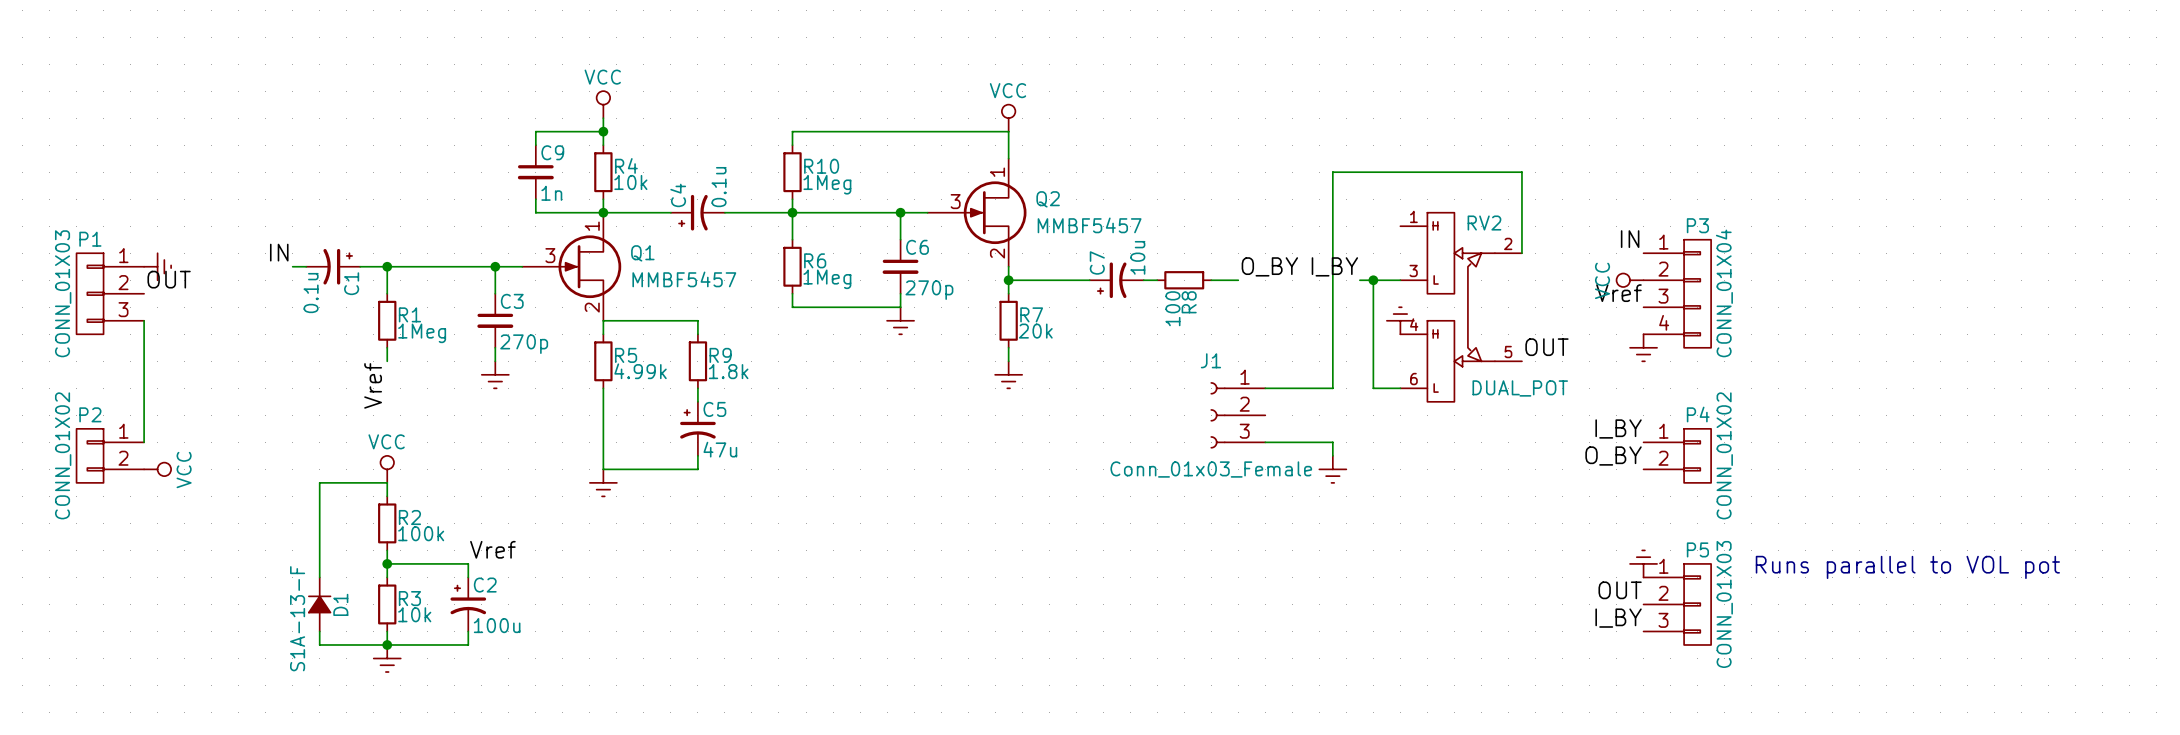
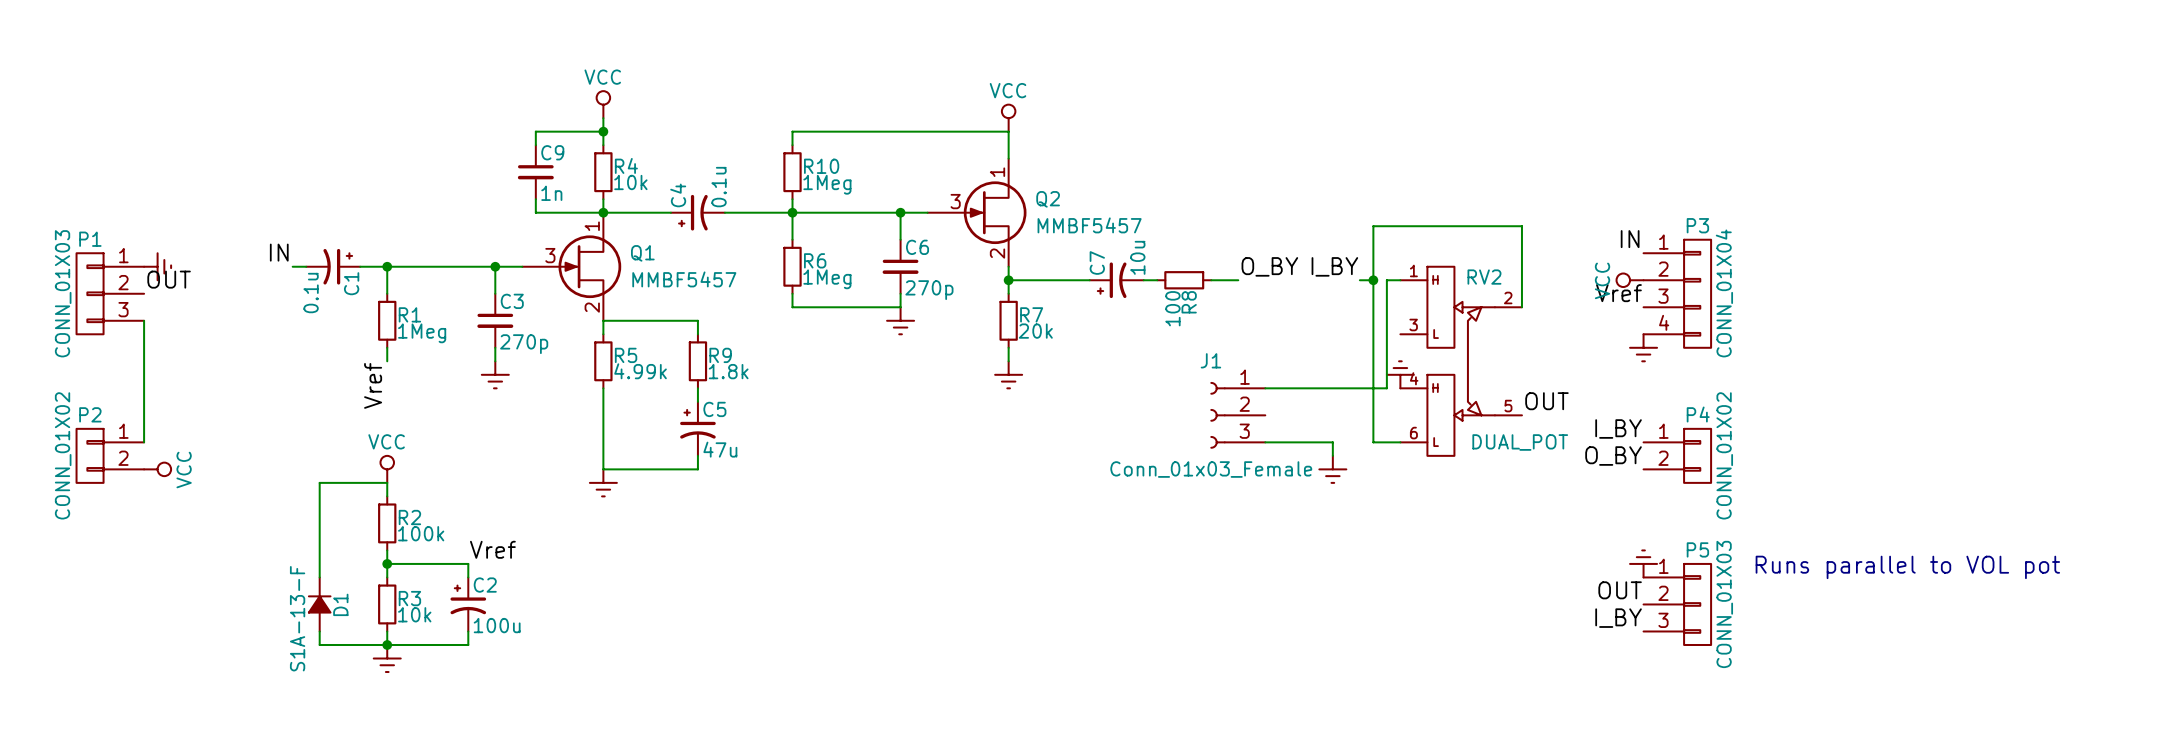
wire: (1521, 226) (1521, 172) (1332, 172) (1332, 388) -> (1521, 226) (1373, 226) (1373, 280)
wire: none -> (1521, 253) (1521, 307)
wire: (1373, 280) (1386, 280) -> none
RV2 position: (1461, 307) -> (1461, 361)
power symbol position: (1400, 320) -> (1400, 374)
label position: OUT (1546, 347) -> OUT (1546, 401)
wire: none -> (1332, 388) (1373, 388) (1373, 442) (1400, 442)
wire: (1386, 388) (1400, 388) -> (1386, 388) (1386, 280)

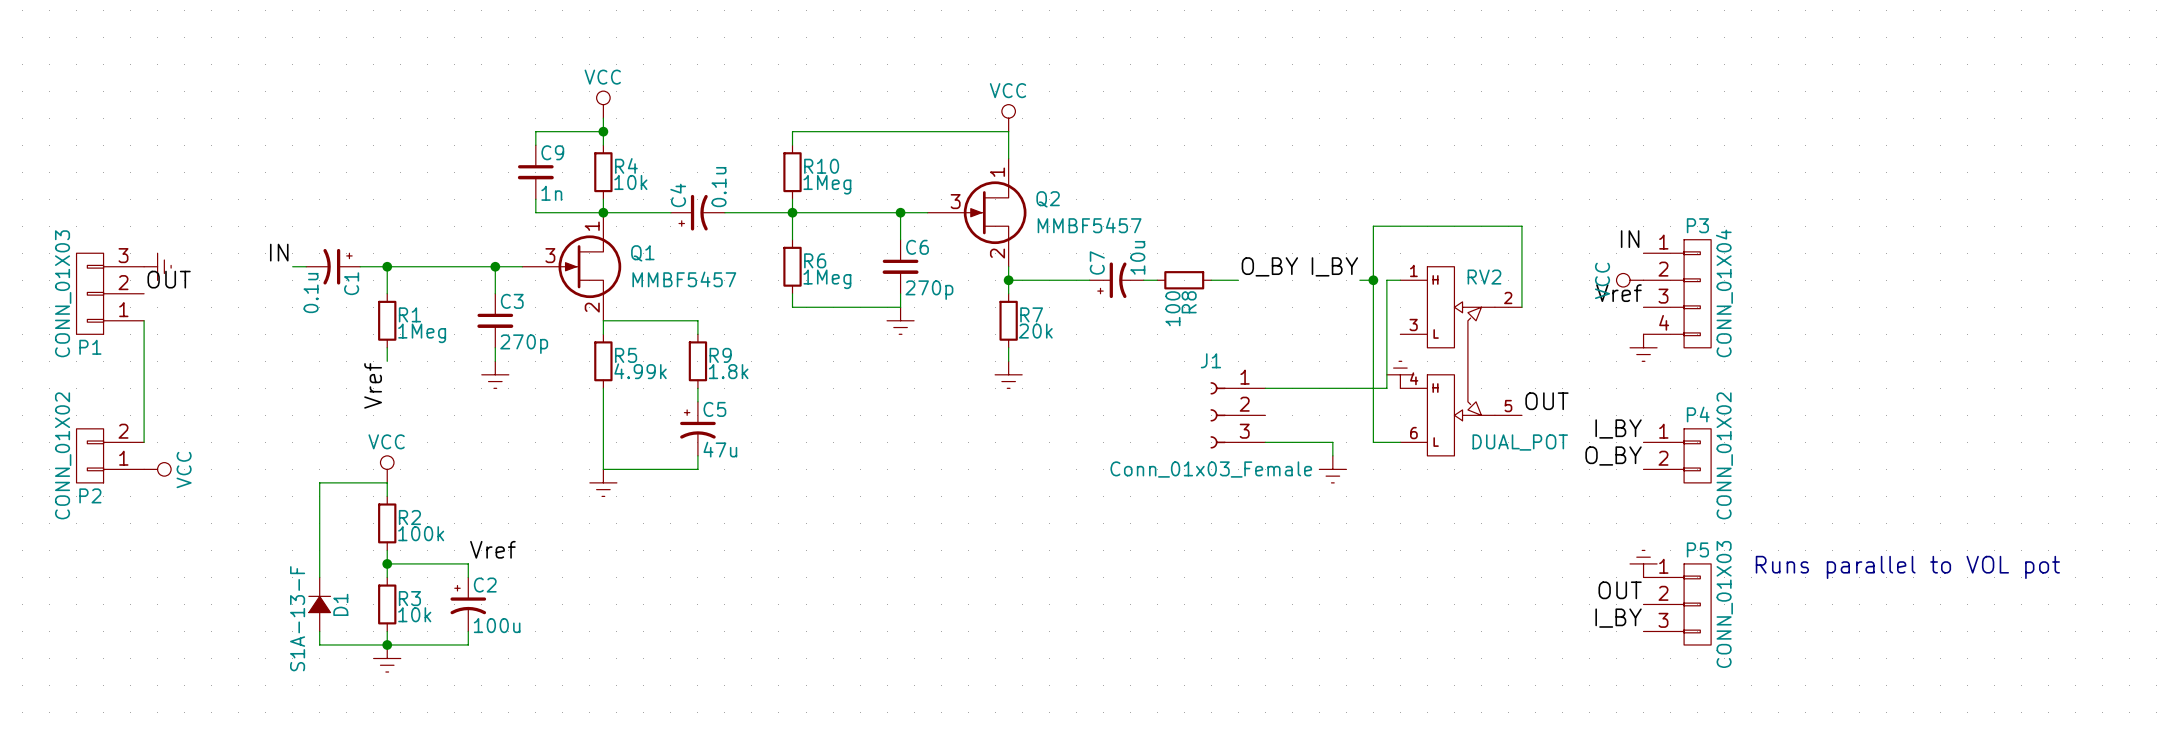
P1 flip: as is (90, 293) -> up-down (90, 293)
P2 flip: as is (90, 455) -> up-down (90, 455)

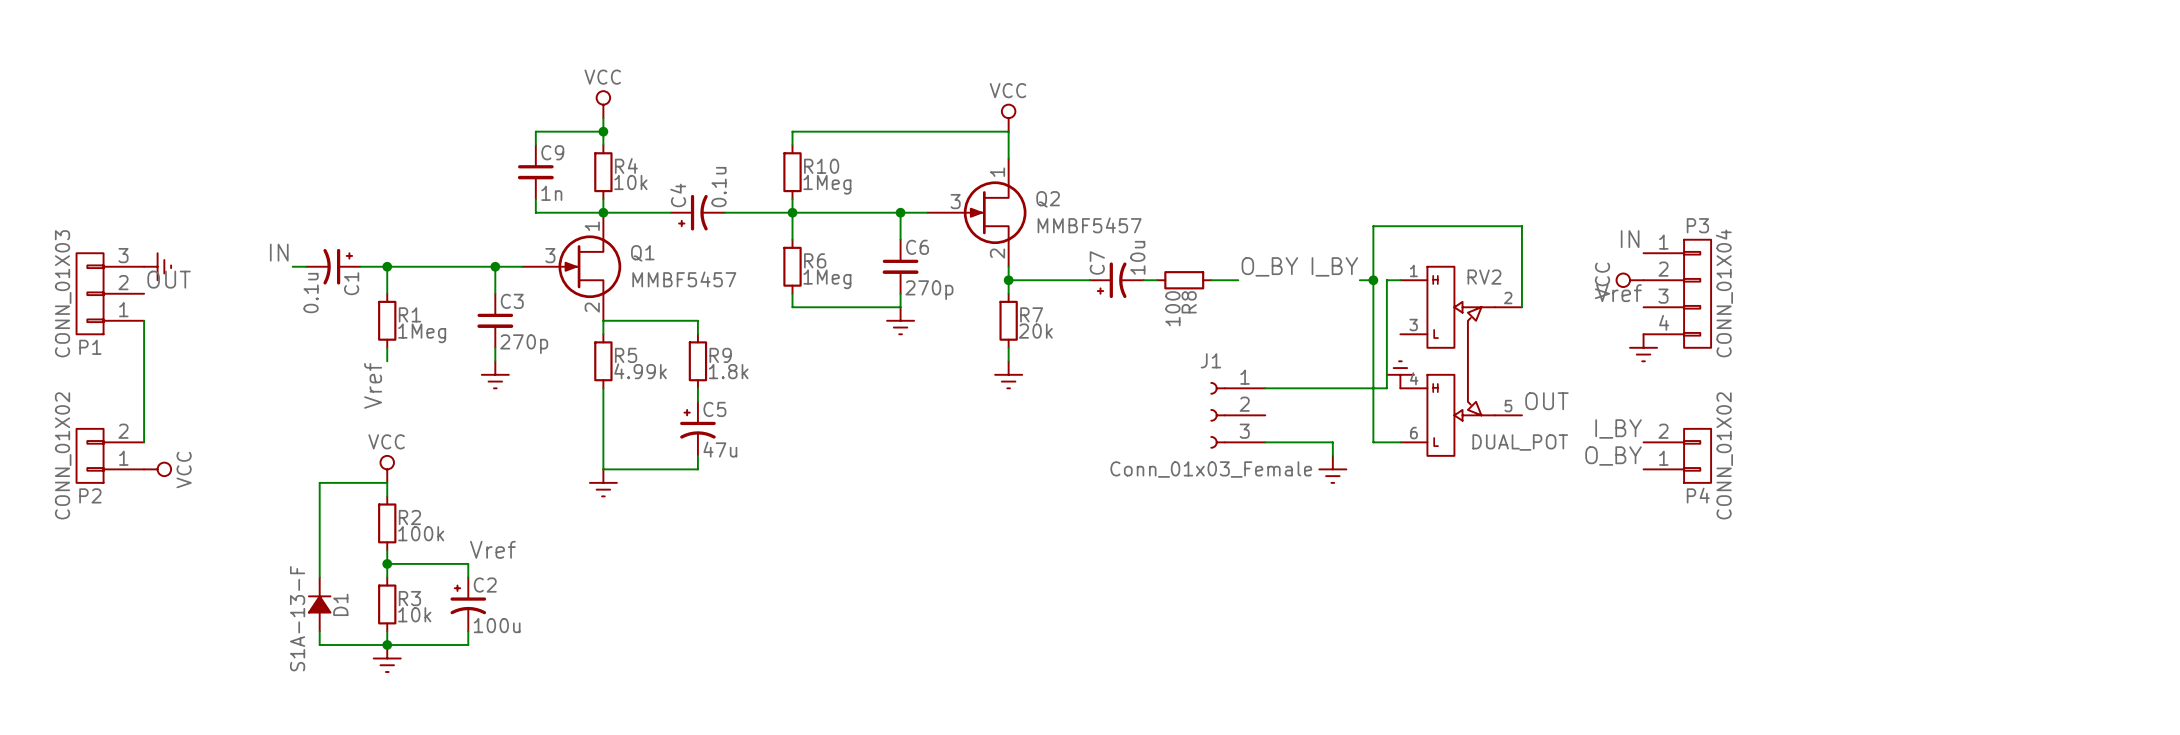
P4 flip: as is (1697, 455) -> up-down (1697, 455)
power symbol: (1643, 563) -> none
text: Runs parallel to VOL pot (1907, 567) -> none
label: OUT (1620, 590) -> none
P5: CONN_01X03 (1677, 604) -> none
label: I_BY (1618, 618) -> none

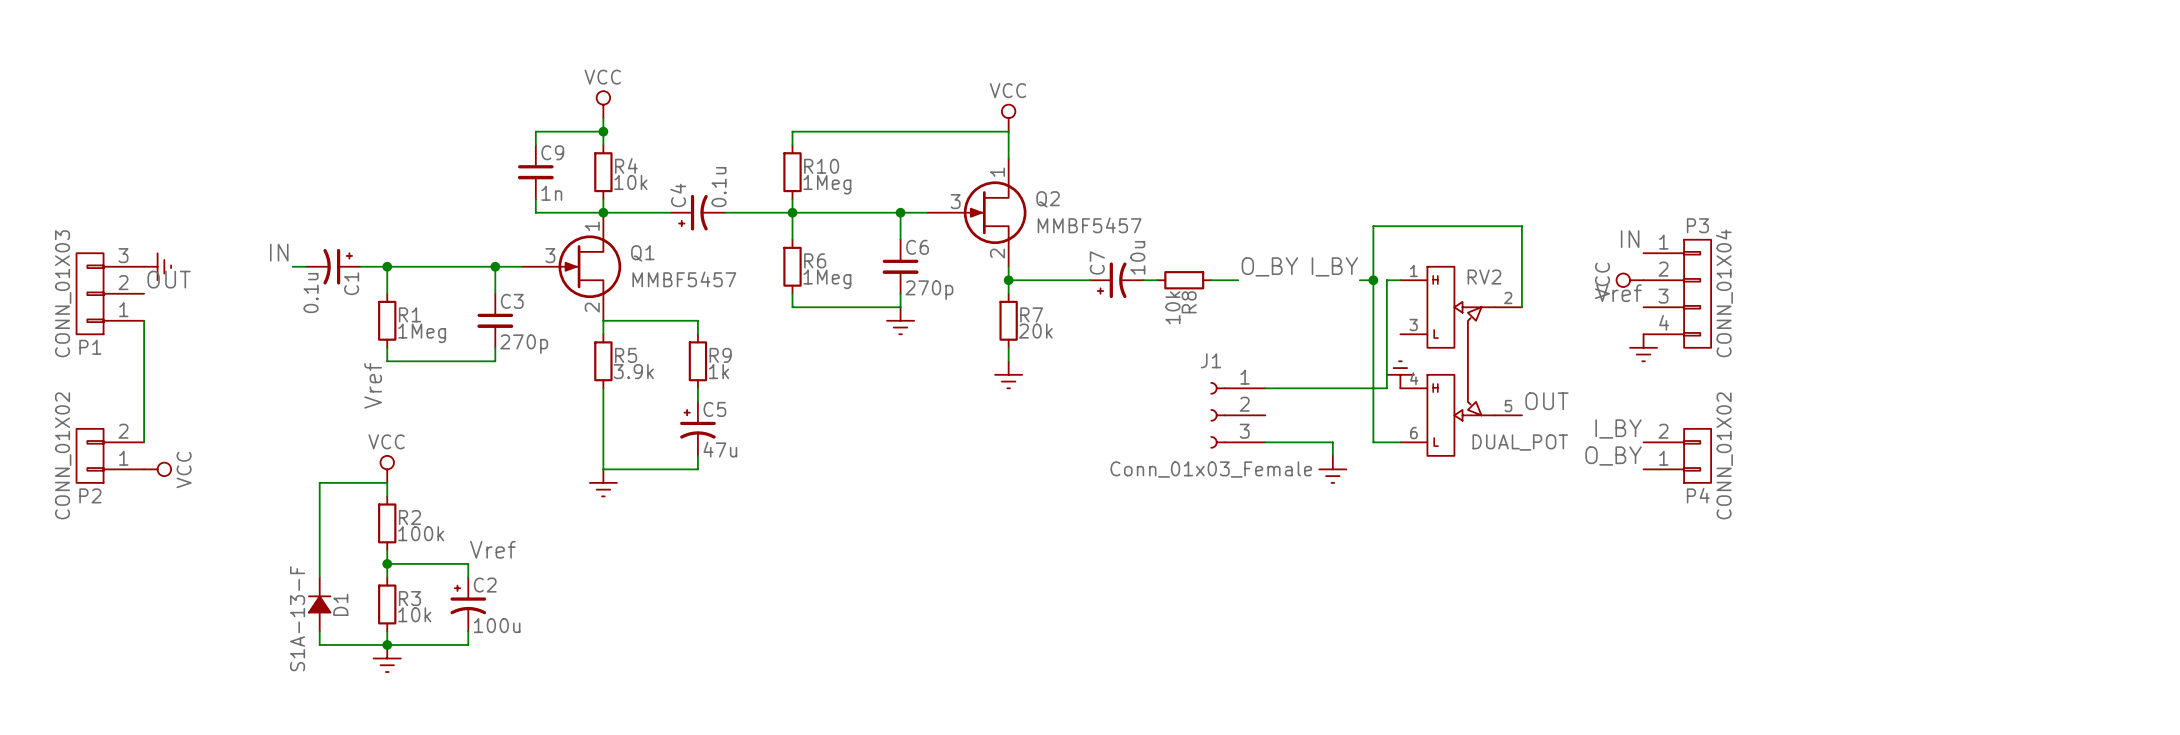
R8 value: 100 (1172, 308) -> 10k (1172, 307)
wire: none -> (387, 361) (495, 361)
R5 value: 4.99k (640, 371) -> 3.9k (633, 371)
R9 value: 1.8k (728, 371) -> 1k (719, 371)
power symbol: (495, 374) -> none

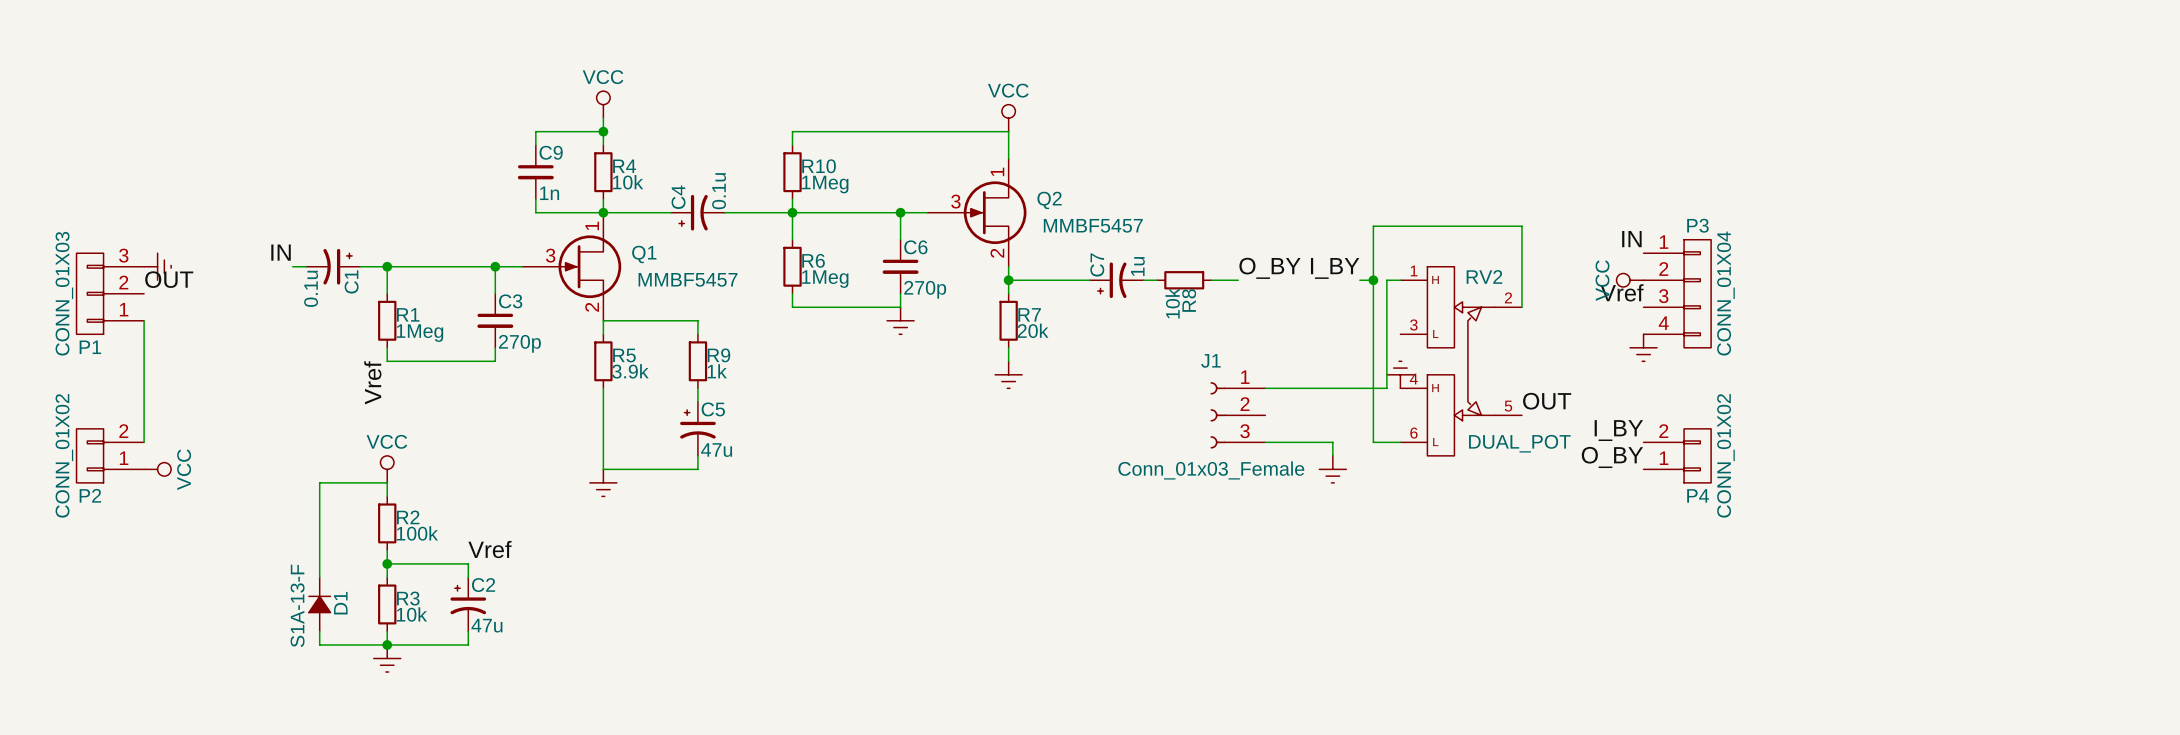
C7 value: 10u (1137, 257) -> 1u (1137, 266)
C2 value: 100u (497, 625) -> 47u (486, 625)

